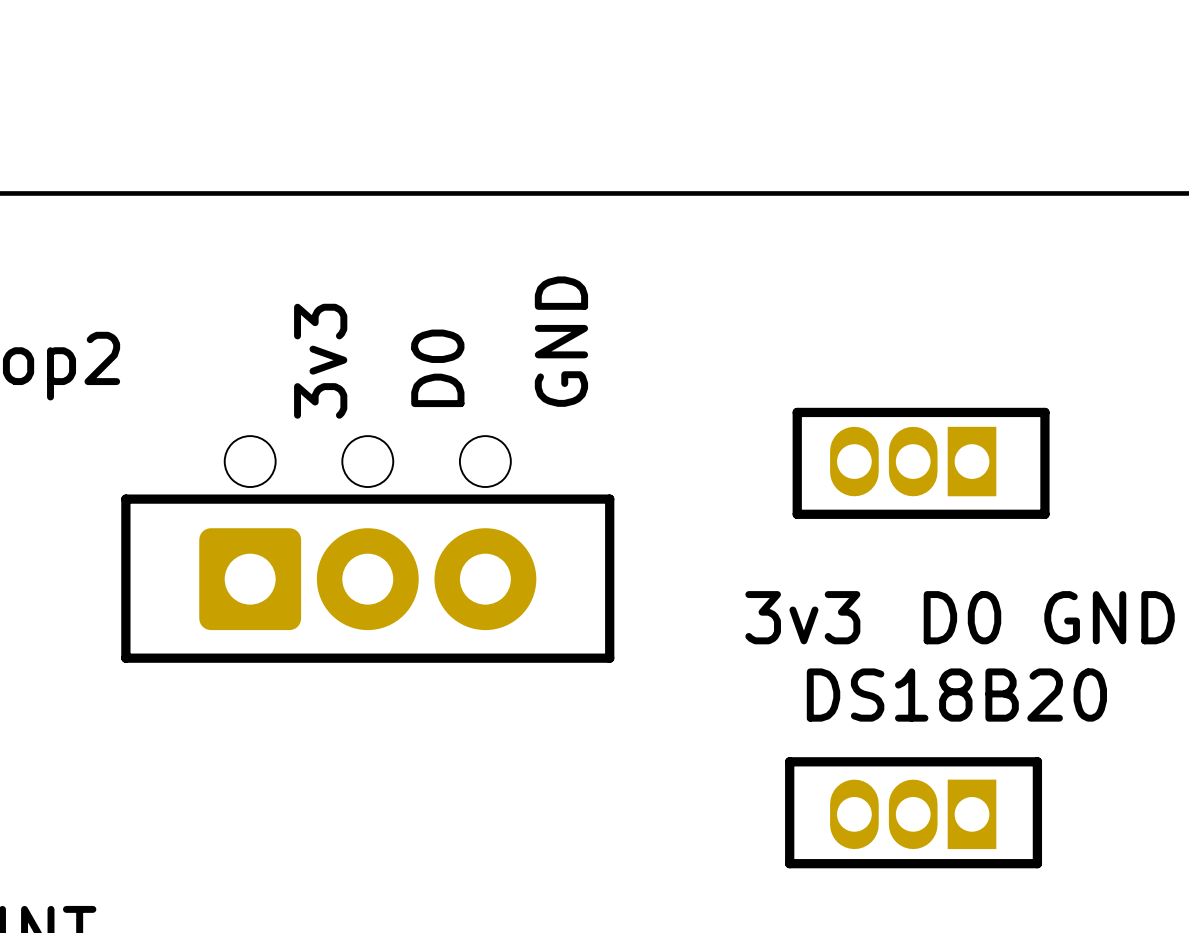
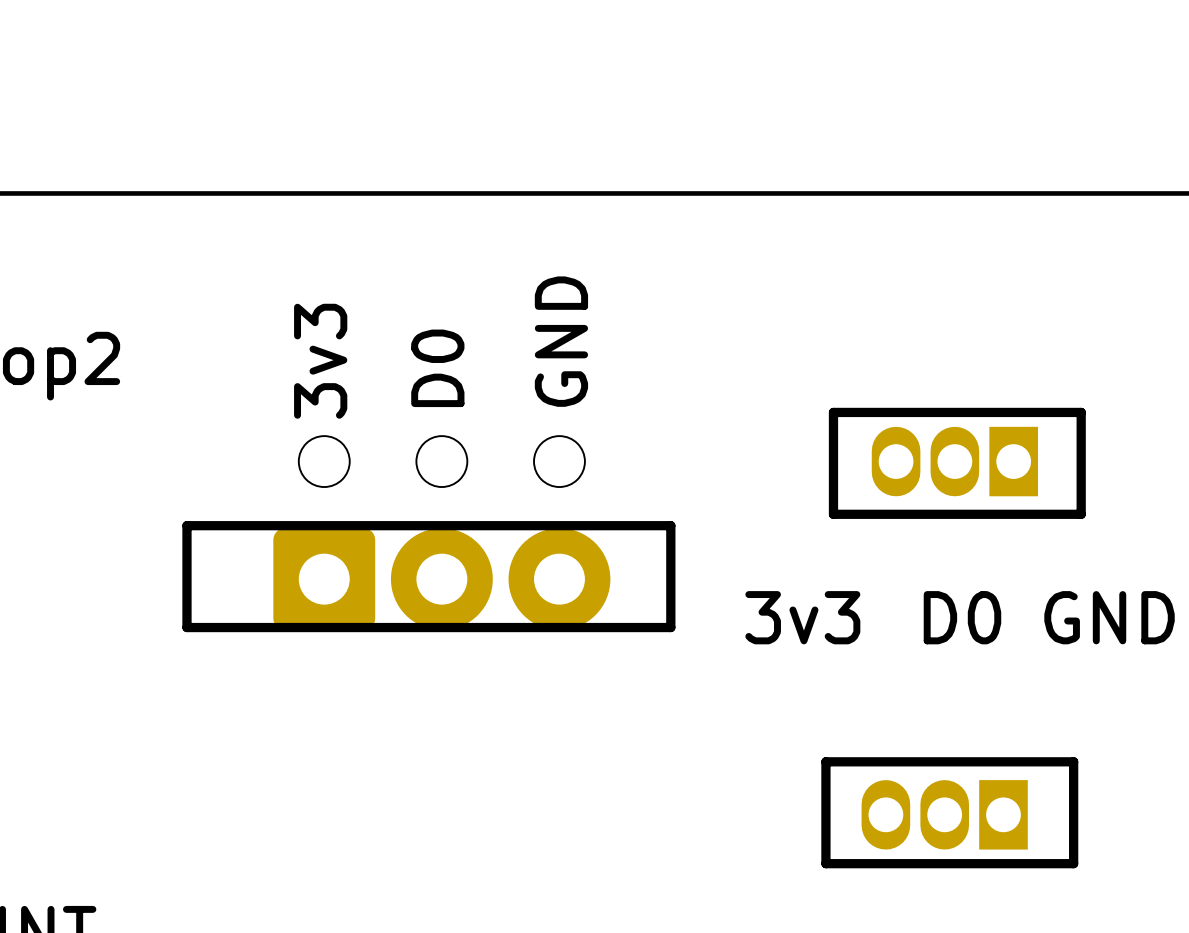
line: (833, 412) (797, 412) (797, 514) (833, 514) -> (833, 412) (833, 514)
line: (1044, 412) (1044, 514) -> (1044, 412) (1081, 412) (1081, 514) (1044, 514)
part position: (913, 461) -> (954, 461)
line: (609, 499) (125, 499) (125, 658) (609, 658) (609, 499) -> (670, 525) (670, 627) (186, 627) (186, 525) (670, 525)
part position: (367, 533) -> (441, 533)
text: DS18B20 (956, 695) -> none
line: (825, 761) (789, 761) (789, 863) (825, 863) -> (825, 761) (825, 863)
line: (1037, 761) (1037, 863) -> (1037, 761) (1073, 761) (1073, 863) (1037, 863)
part position: (913, 814) -> (944, 814)

